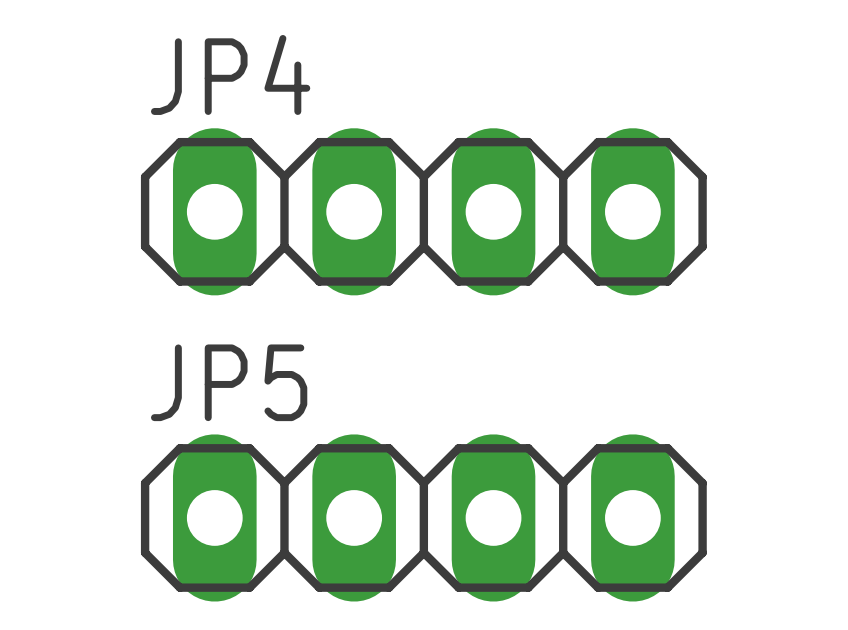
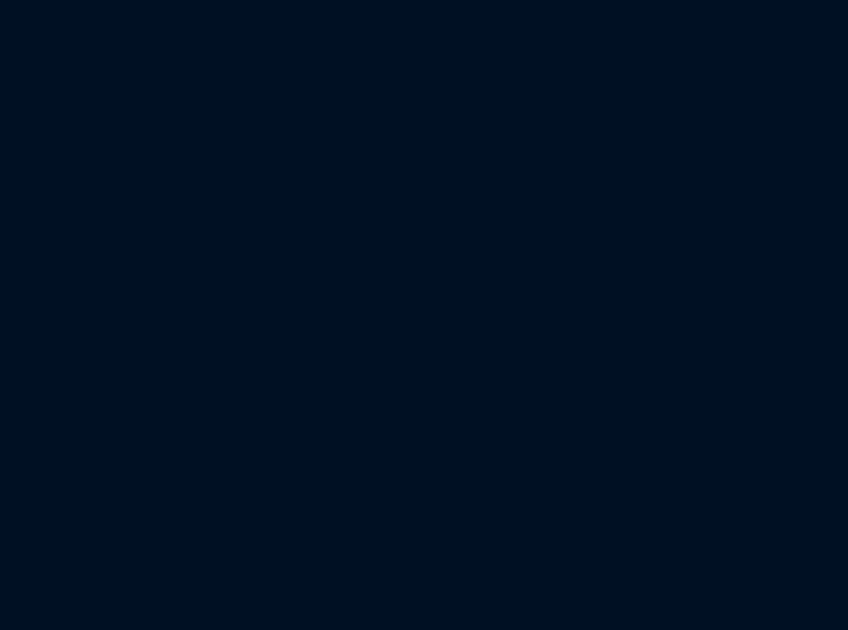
JP4: (423, 211) -> none
JP5: (423, 517) -> none

